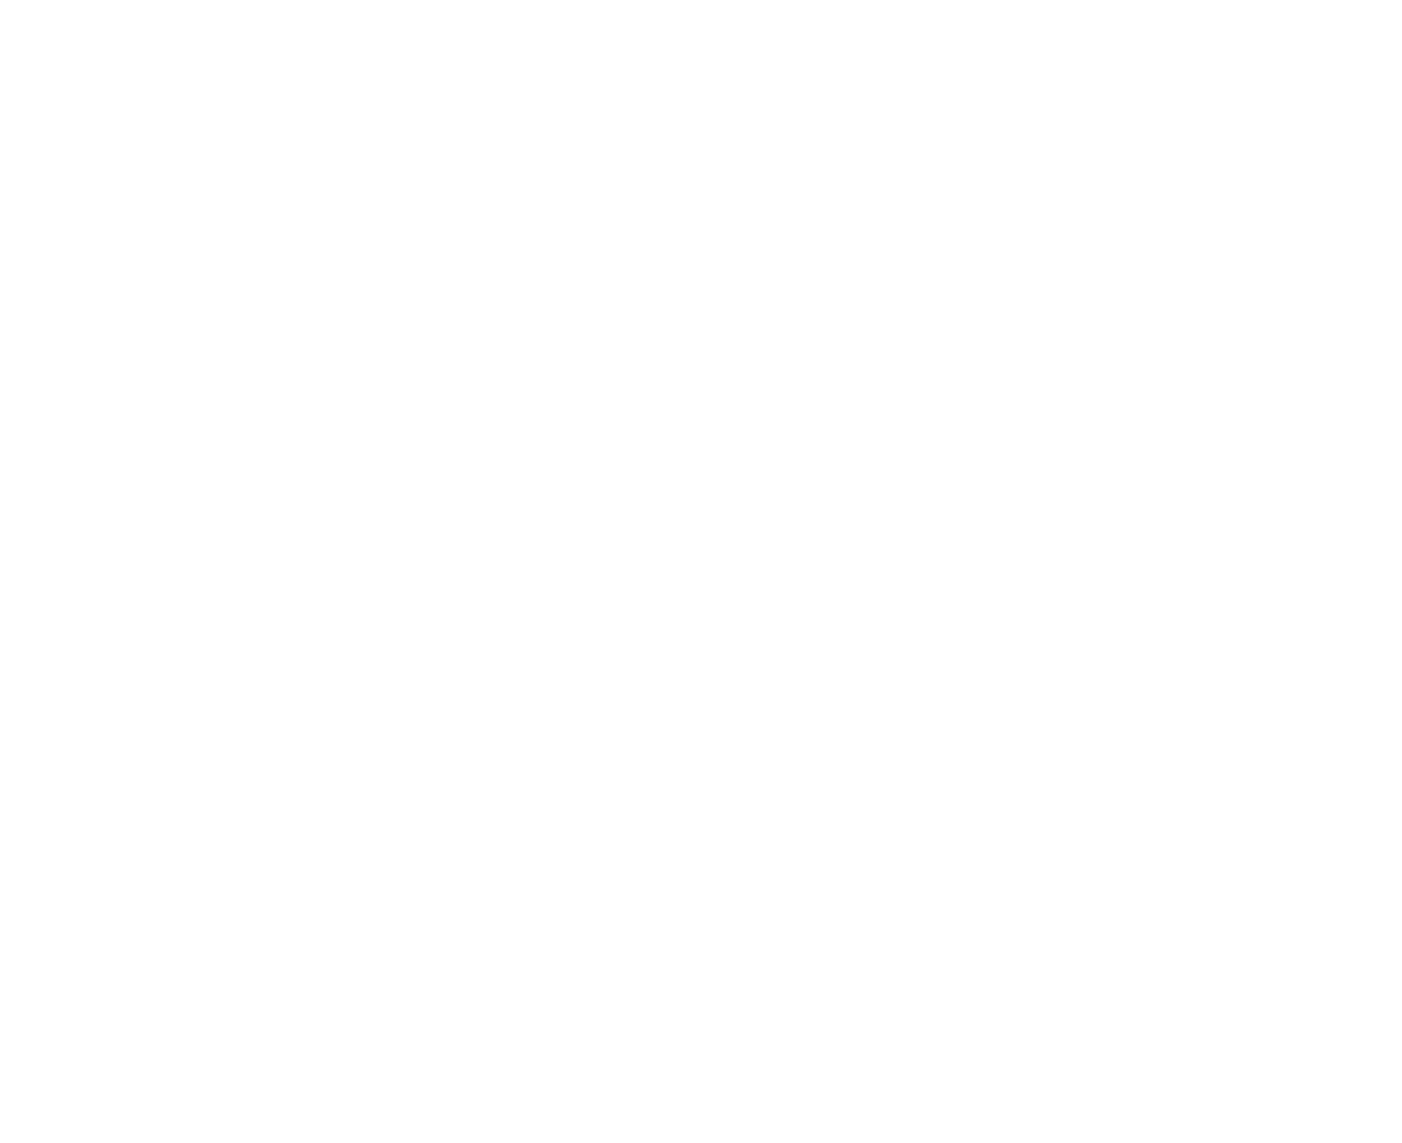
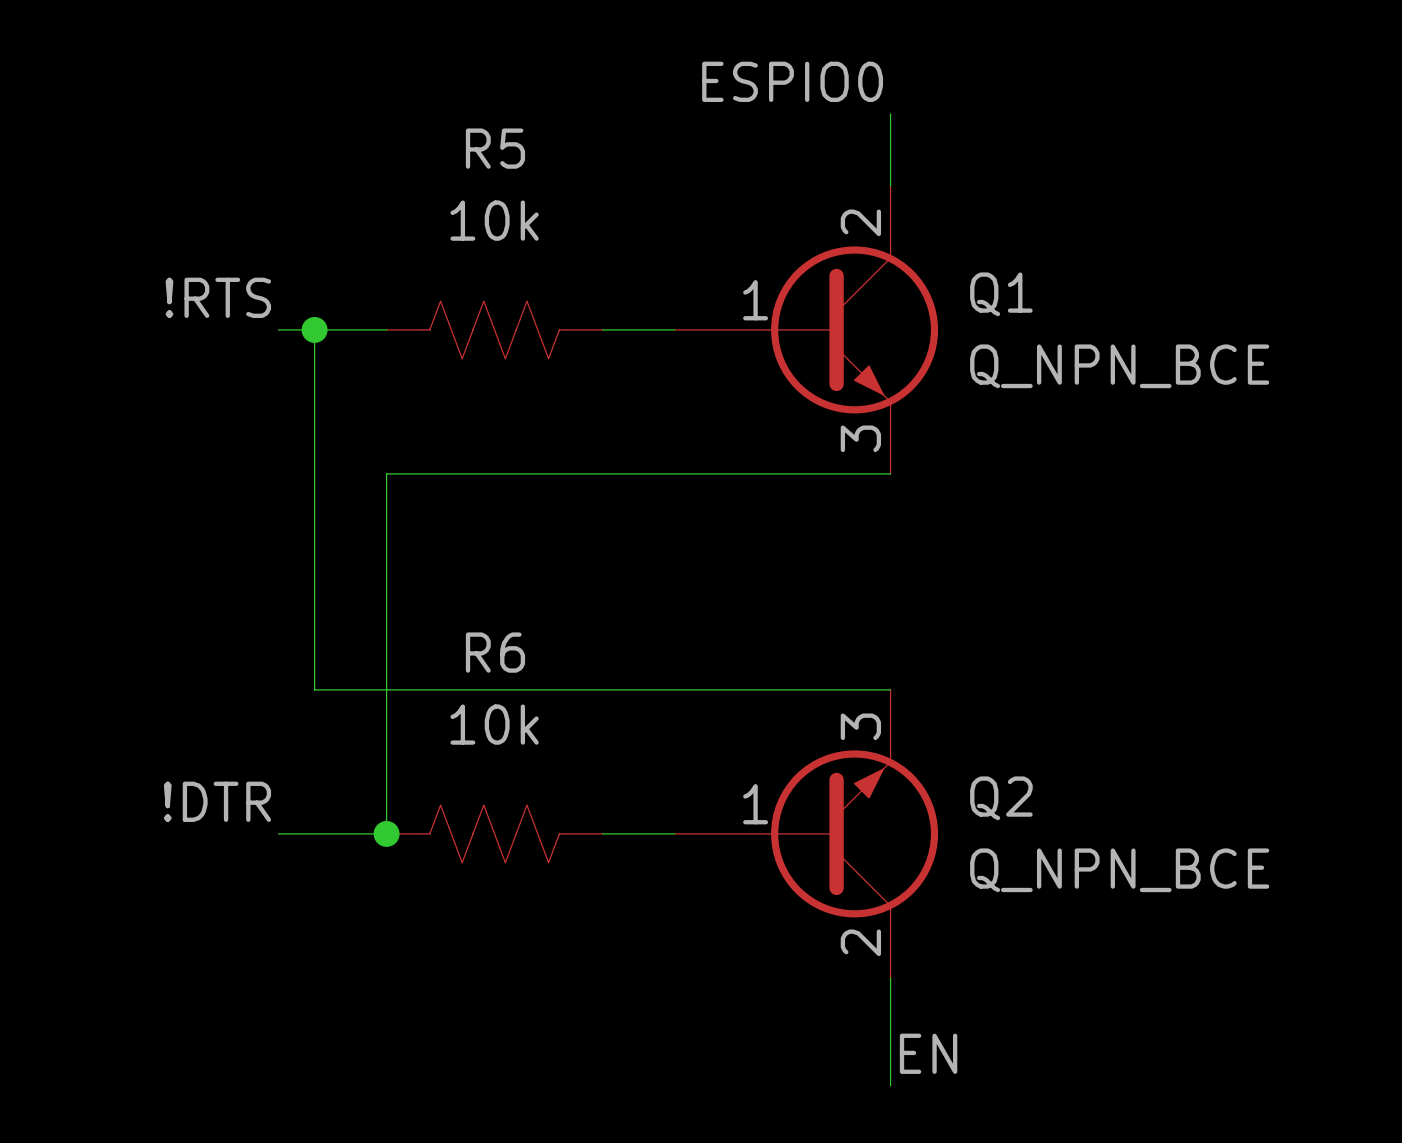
label: none -> ESPIO0 (792, 81)
wire: none -> (890, 113) (890, 185)
label: none -> !RTS (218, 297)
wire: none -> (278, 329) (386, 329)
wire: none -> (314, 329) (314, 689) (890, 689)
junction: none -> (314, 329)
R5: none -> 10k (494, 329)
wire: none -> (602, 329) (674, 329)
Q1: none -> Q_NPN_BCE (806, 329)
wire: none -> (890, 473) (386, 473) (386, 833) (278, 833)
label: none -> !DTR (217, 801)
junction: none -> (386, 833)
R6: none -> 10k (494, 833)
wire: none -> (602, 833) (674, 833)
Q2: none -> Q_NPN_BCE (806, 833)
wire: none -> (890, 977) (890, 1085)
label: none -> EN (928, 1053)

